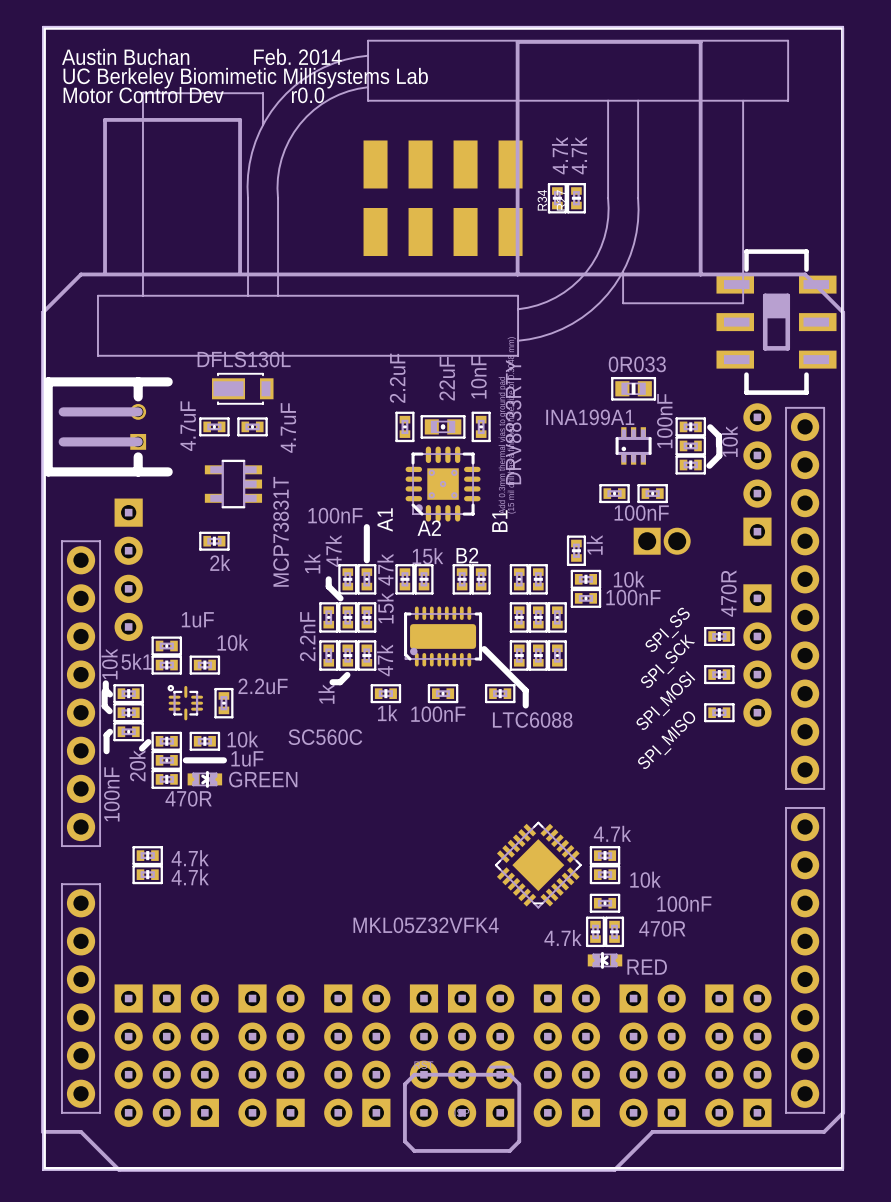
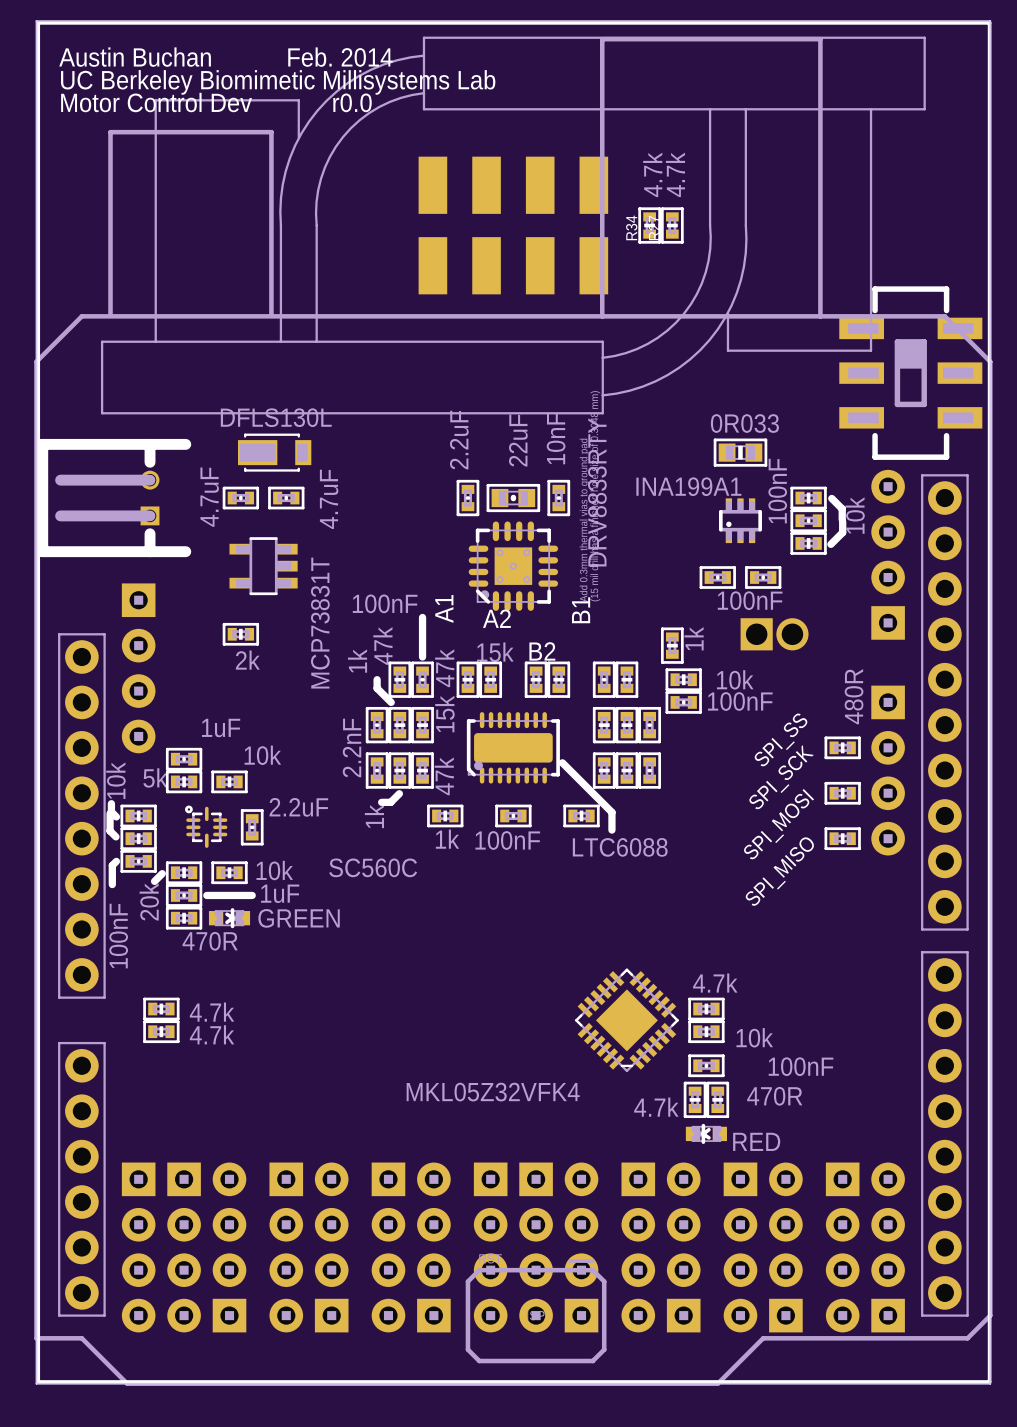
part value: 470R (728, 593) -> 480R (854, 696)
part value: 5k1 (136, 661) -> 5k (155, 777)

